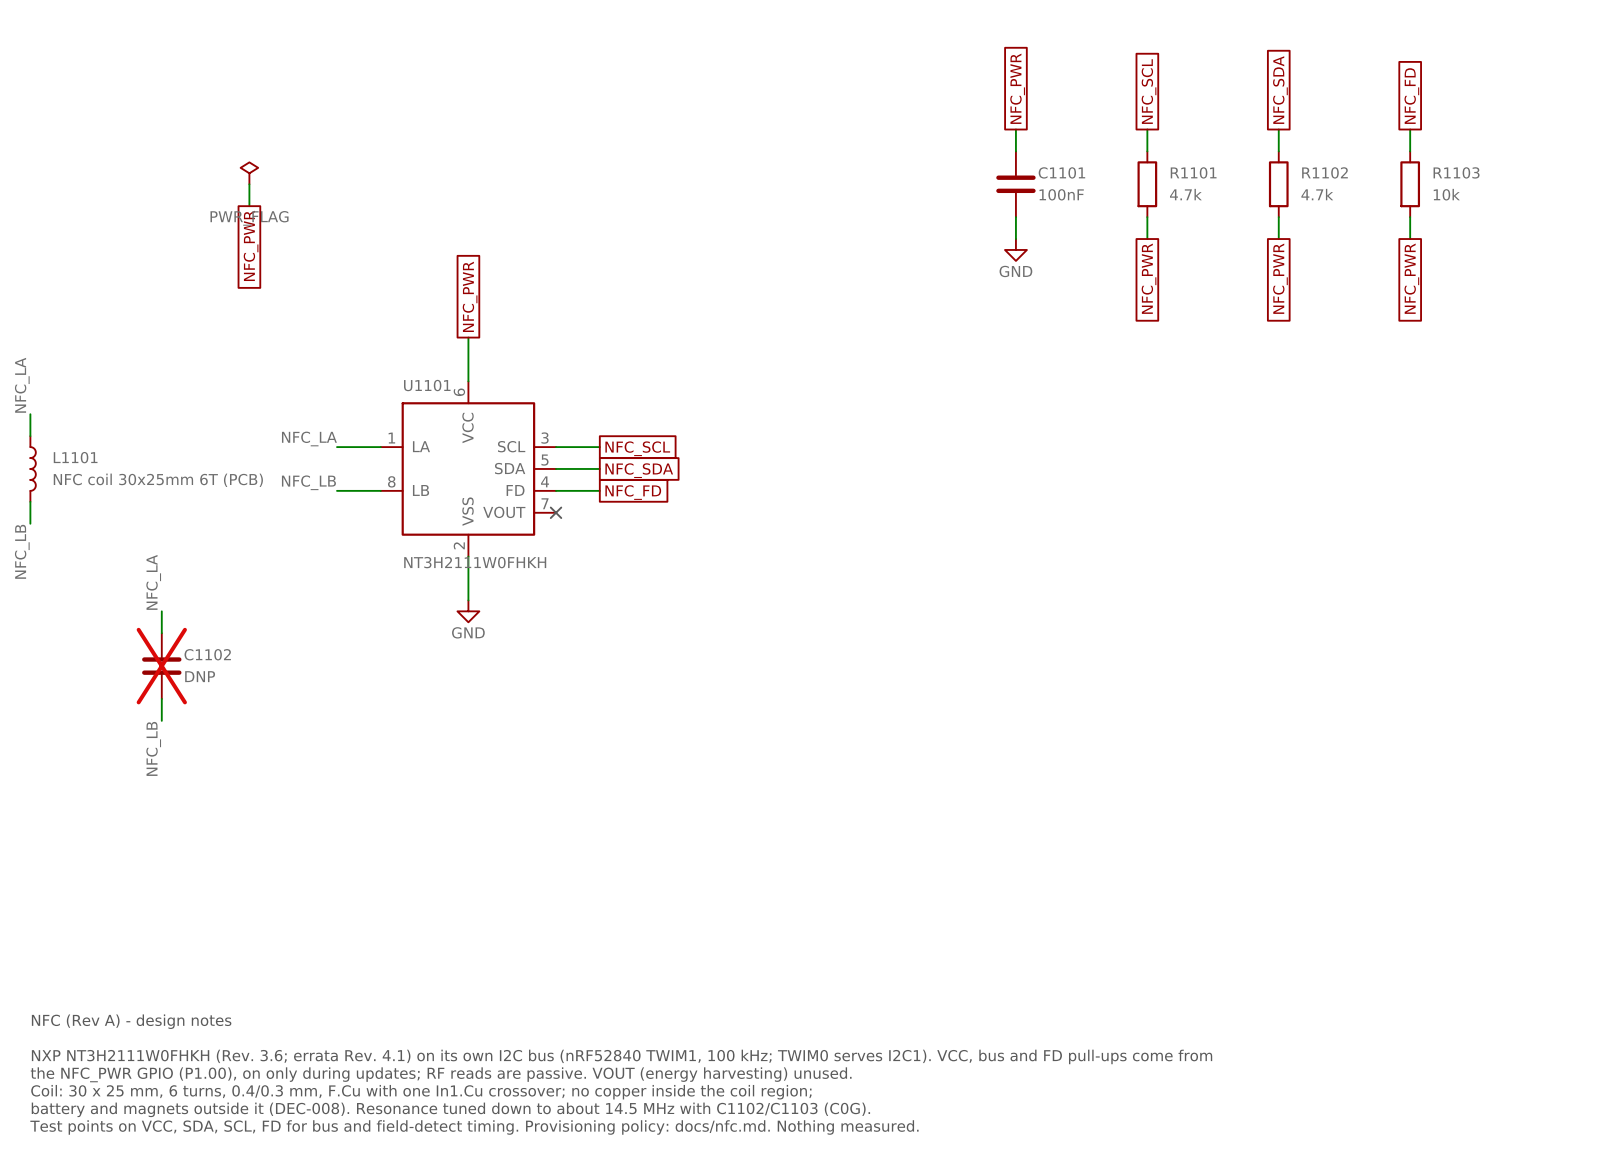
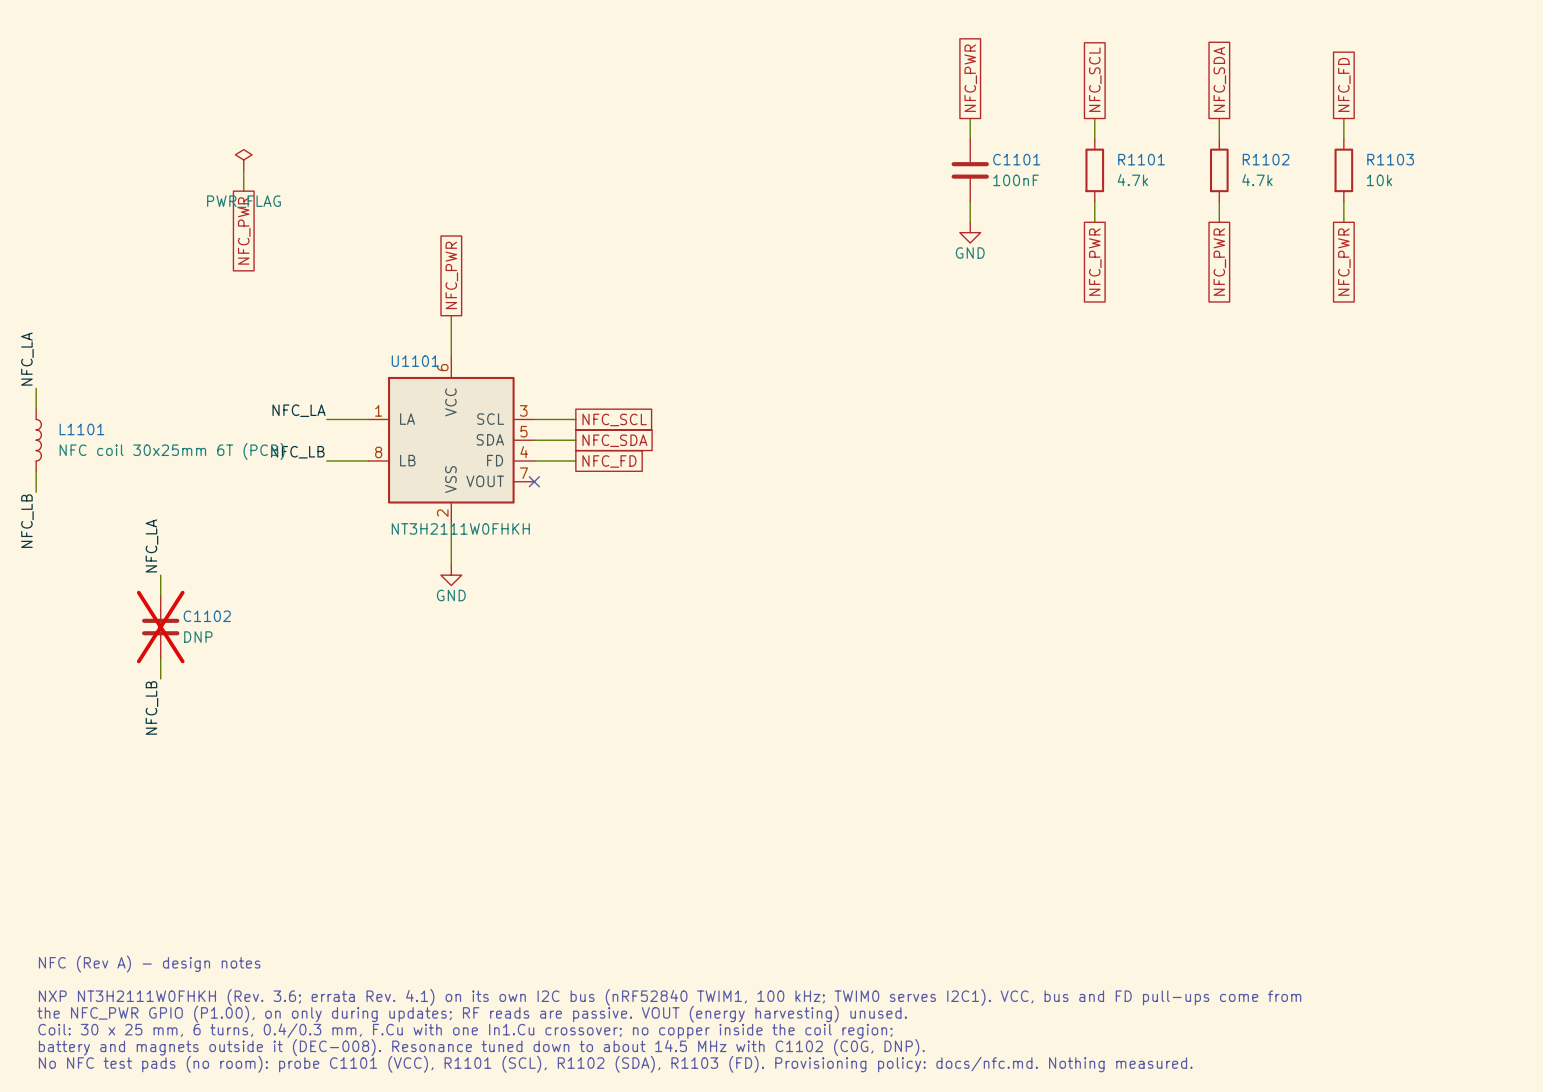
text: battery and magnets outside it (DEC-008). Resonance tuned down to about 14.5 MHz with C1102/C1103 (C0G). (450, 1109) -> battery and magnets outside it (DEC-008). Resonance tuned down to about 14.5 MHz with C1102 (C0G, DNP). (481, 1047)
text: Test points on VCC, SDA, SCL, FD for bus and field-detect timing. Provisioning policy: docs/nfc.md. Nothing measured. (474, 1127) -> No NFC test pads (no room): probe C1101 (VCC), R1101 (SCL), R1102 (SDA), R1103 (FD). Provisioning policy: docs/nfc.md. Nothing measured. (615, 1064)

